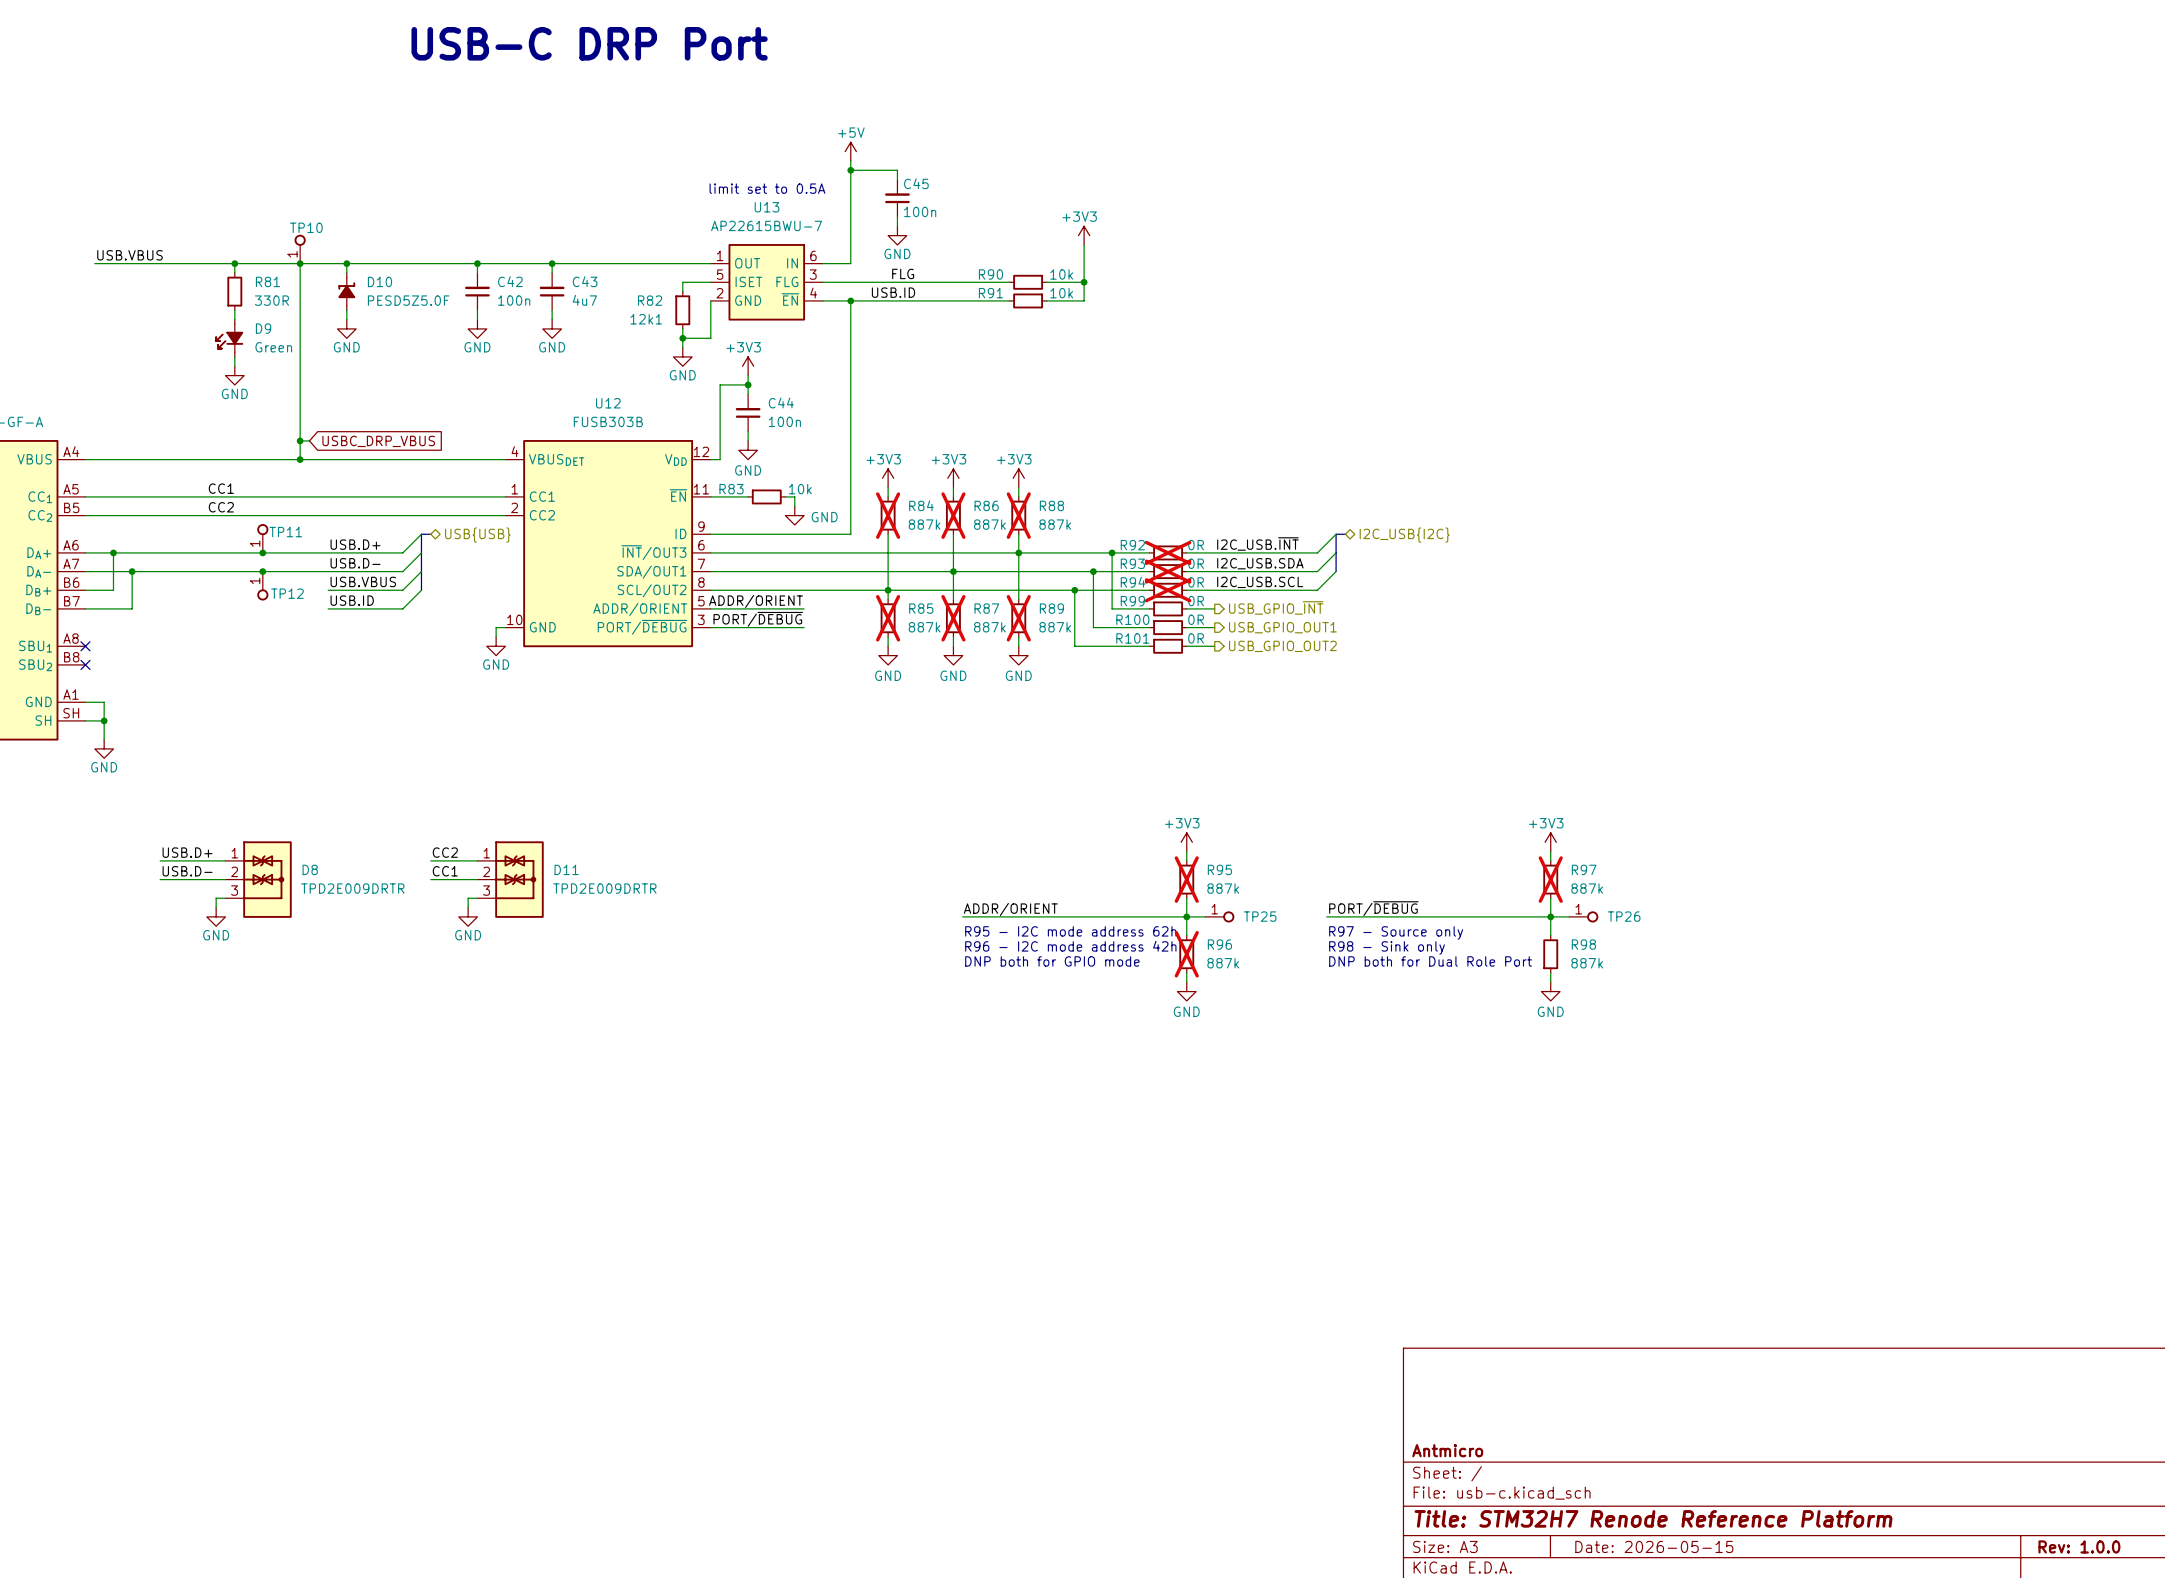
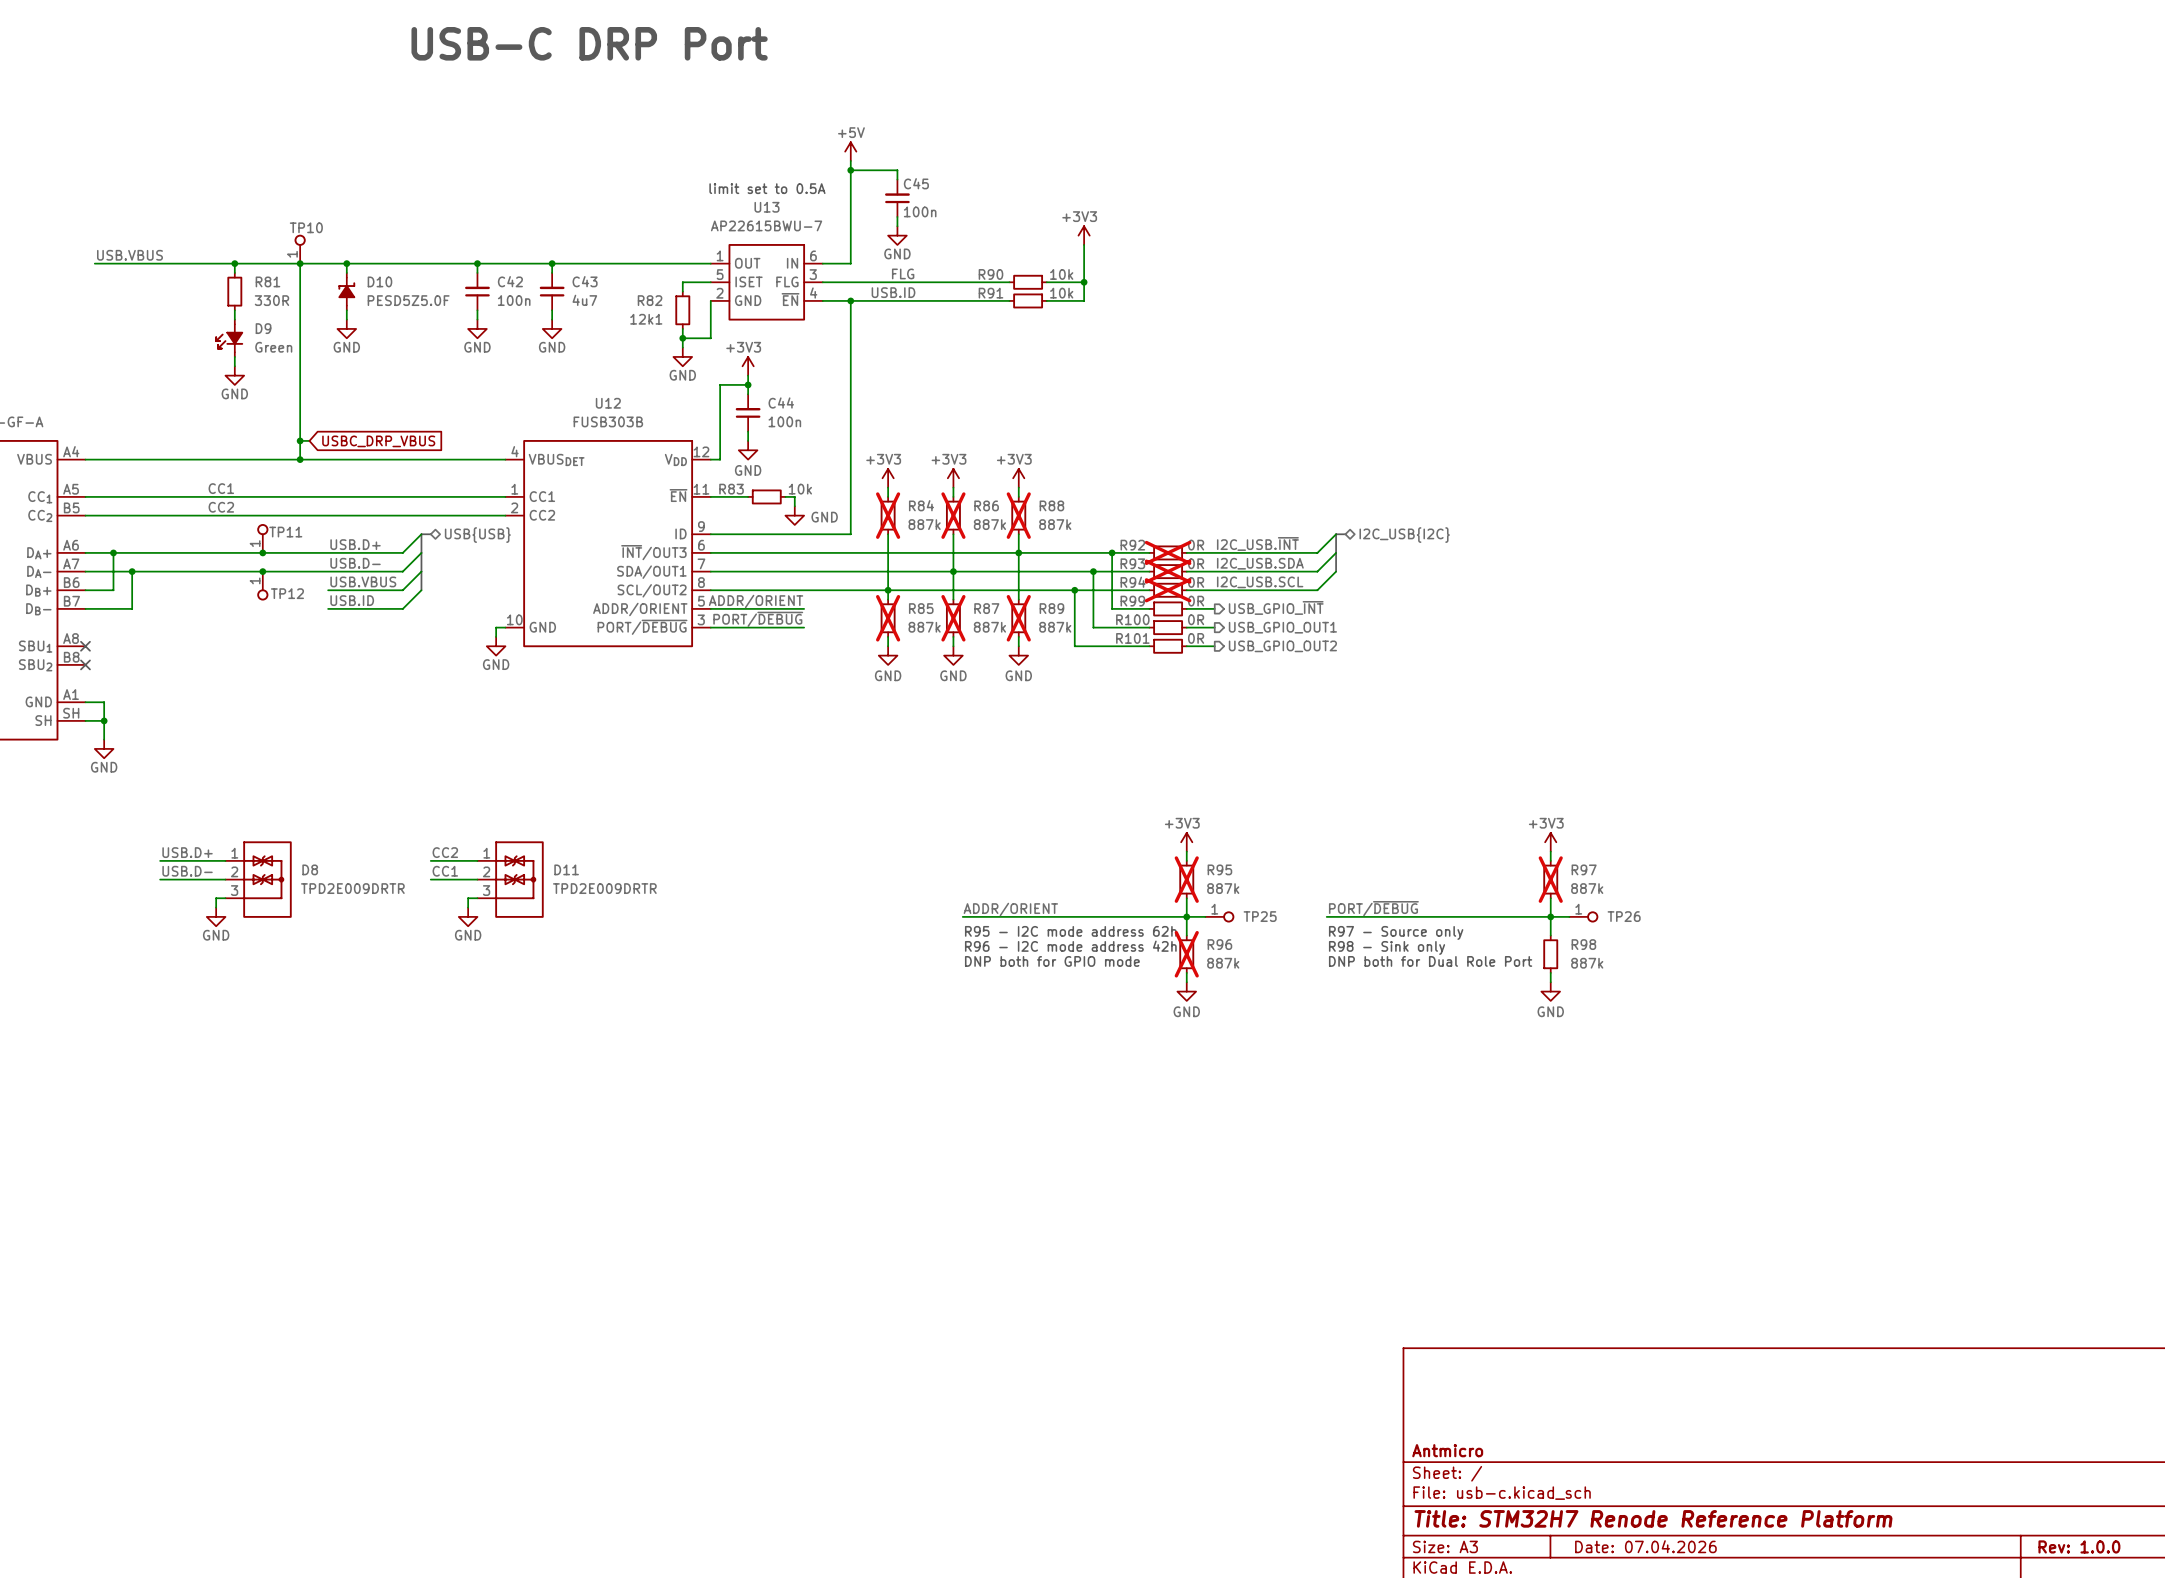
title block: Date: 2026-05-15 (1654, 1546) -> Date: 07.04.2026 (1645, 1546)

